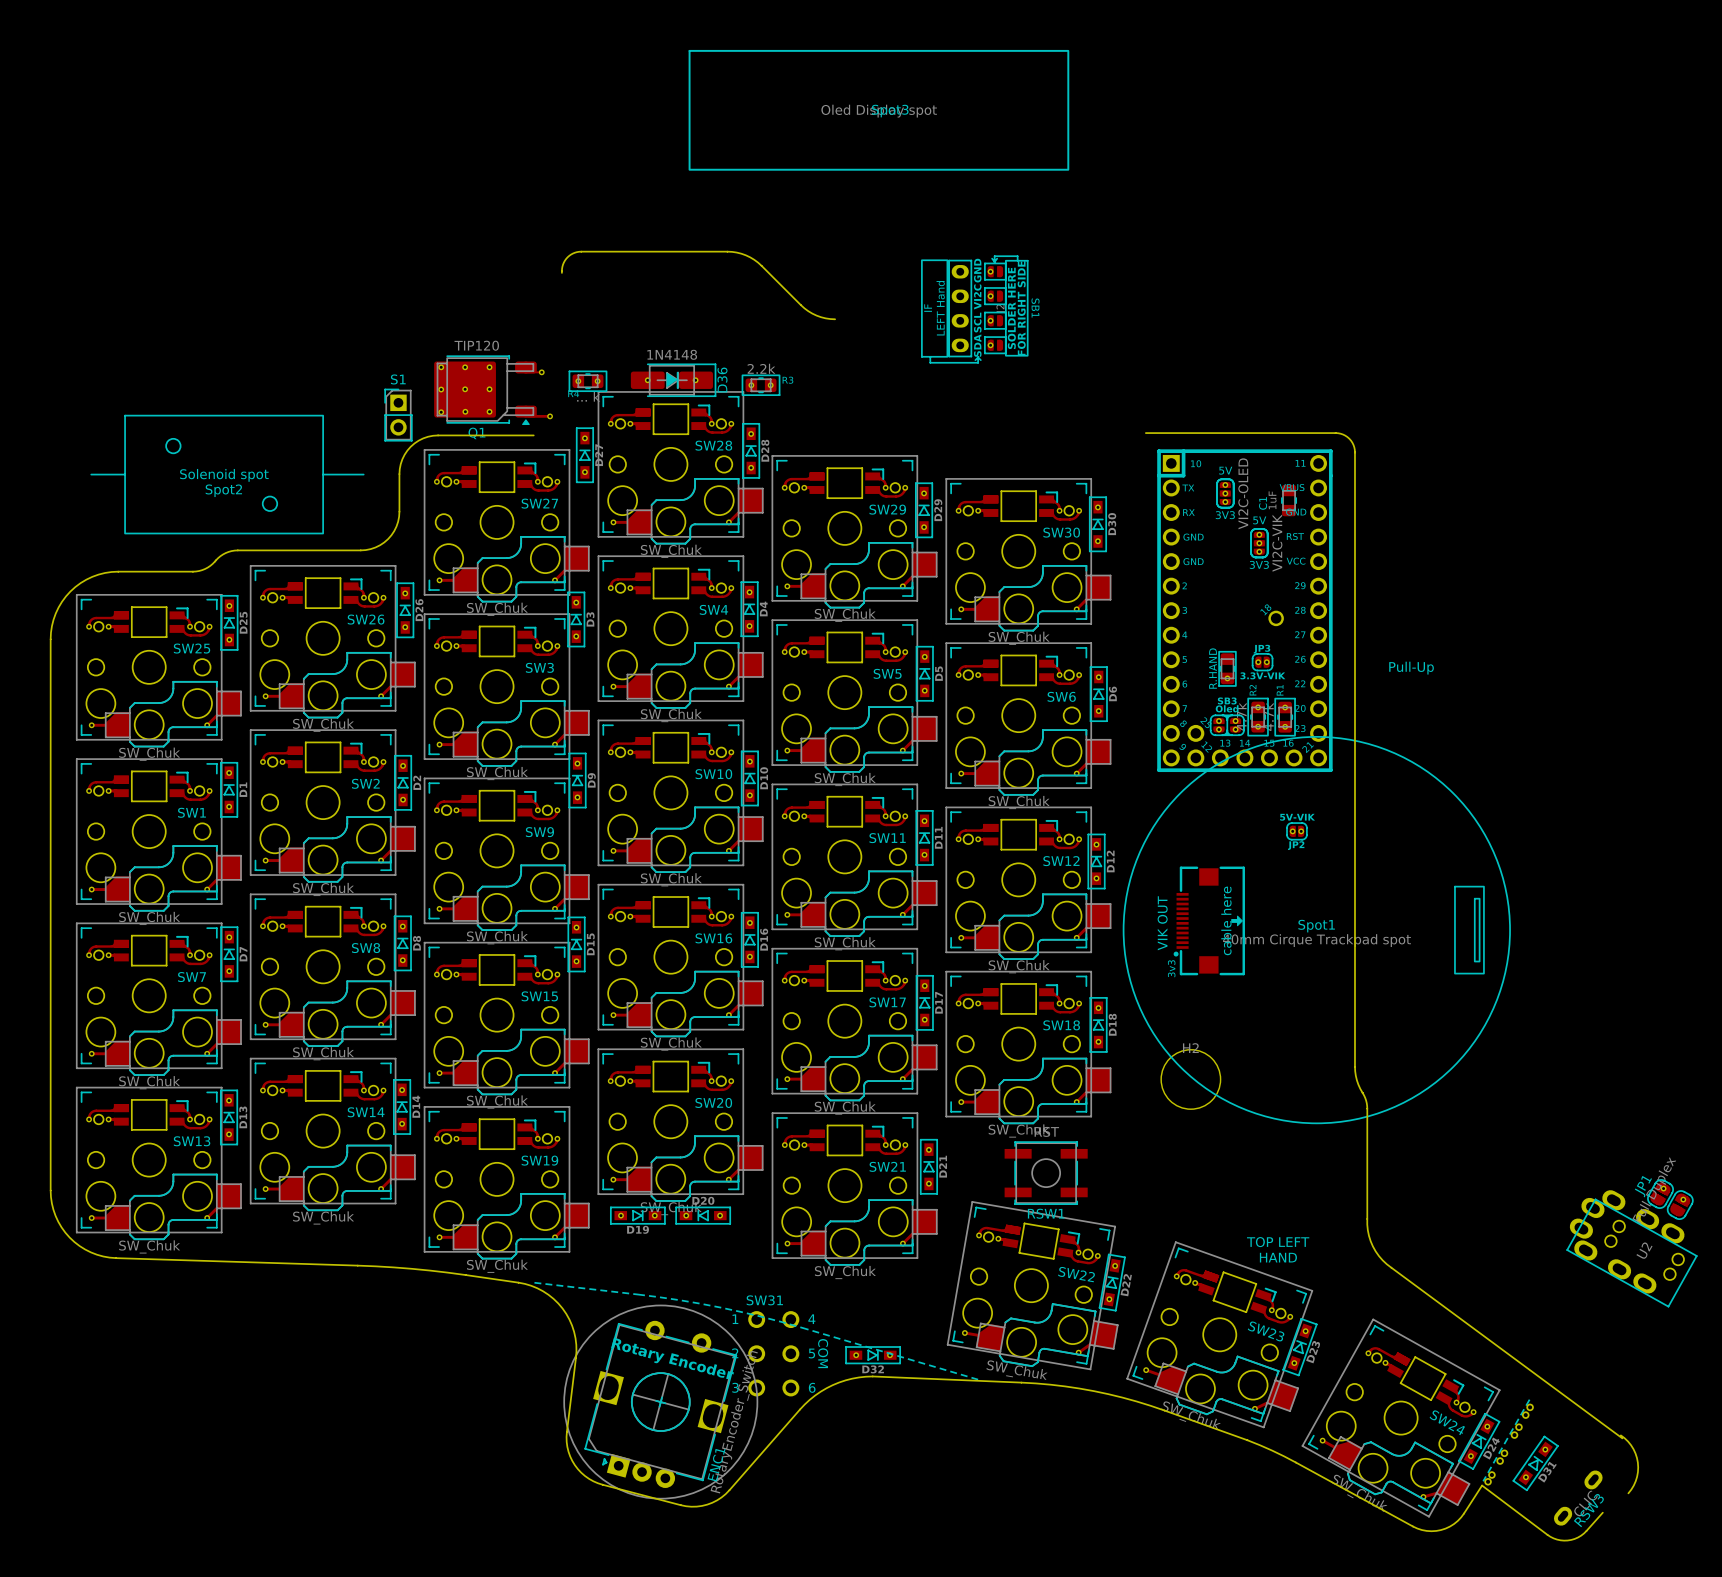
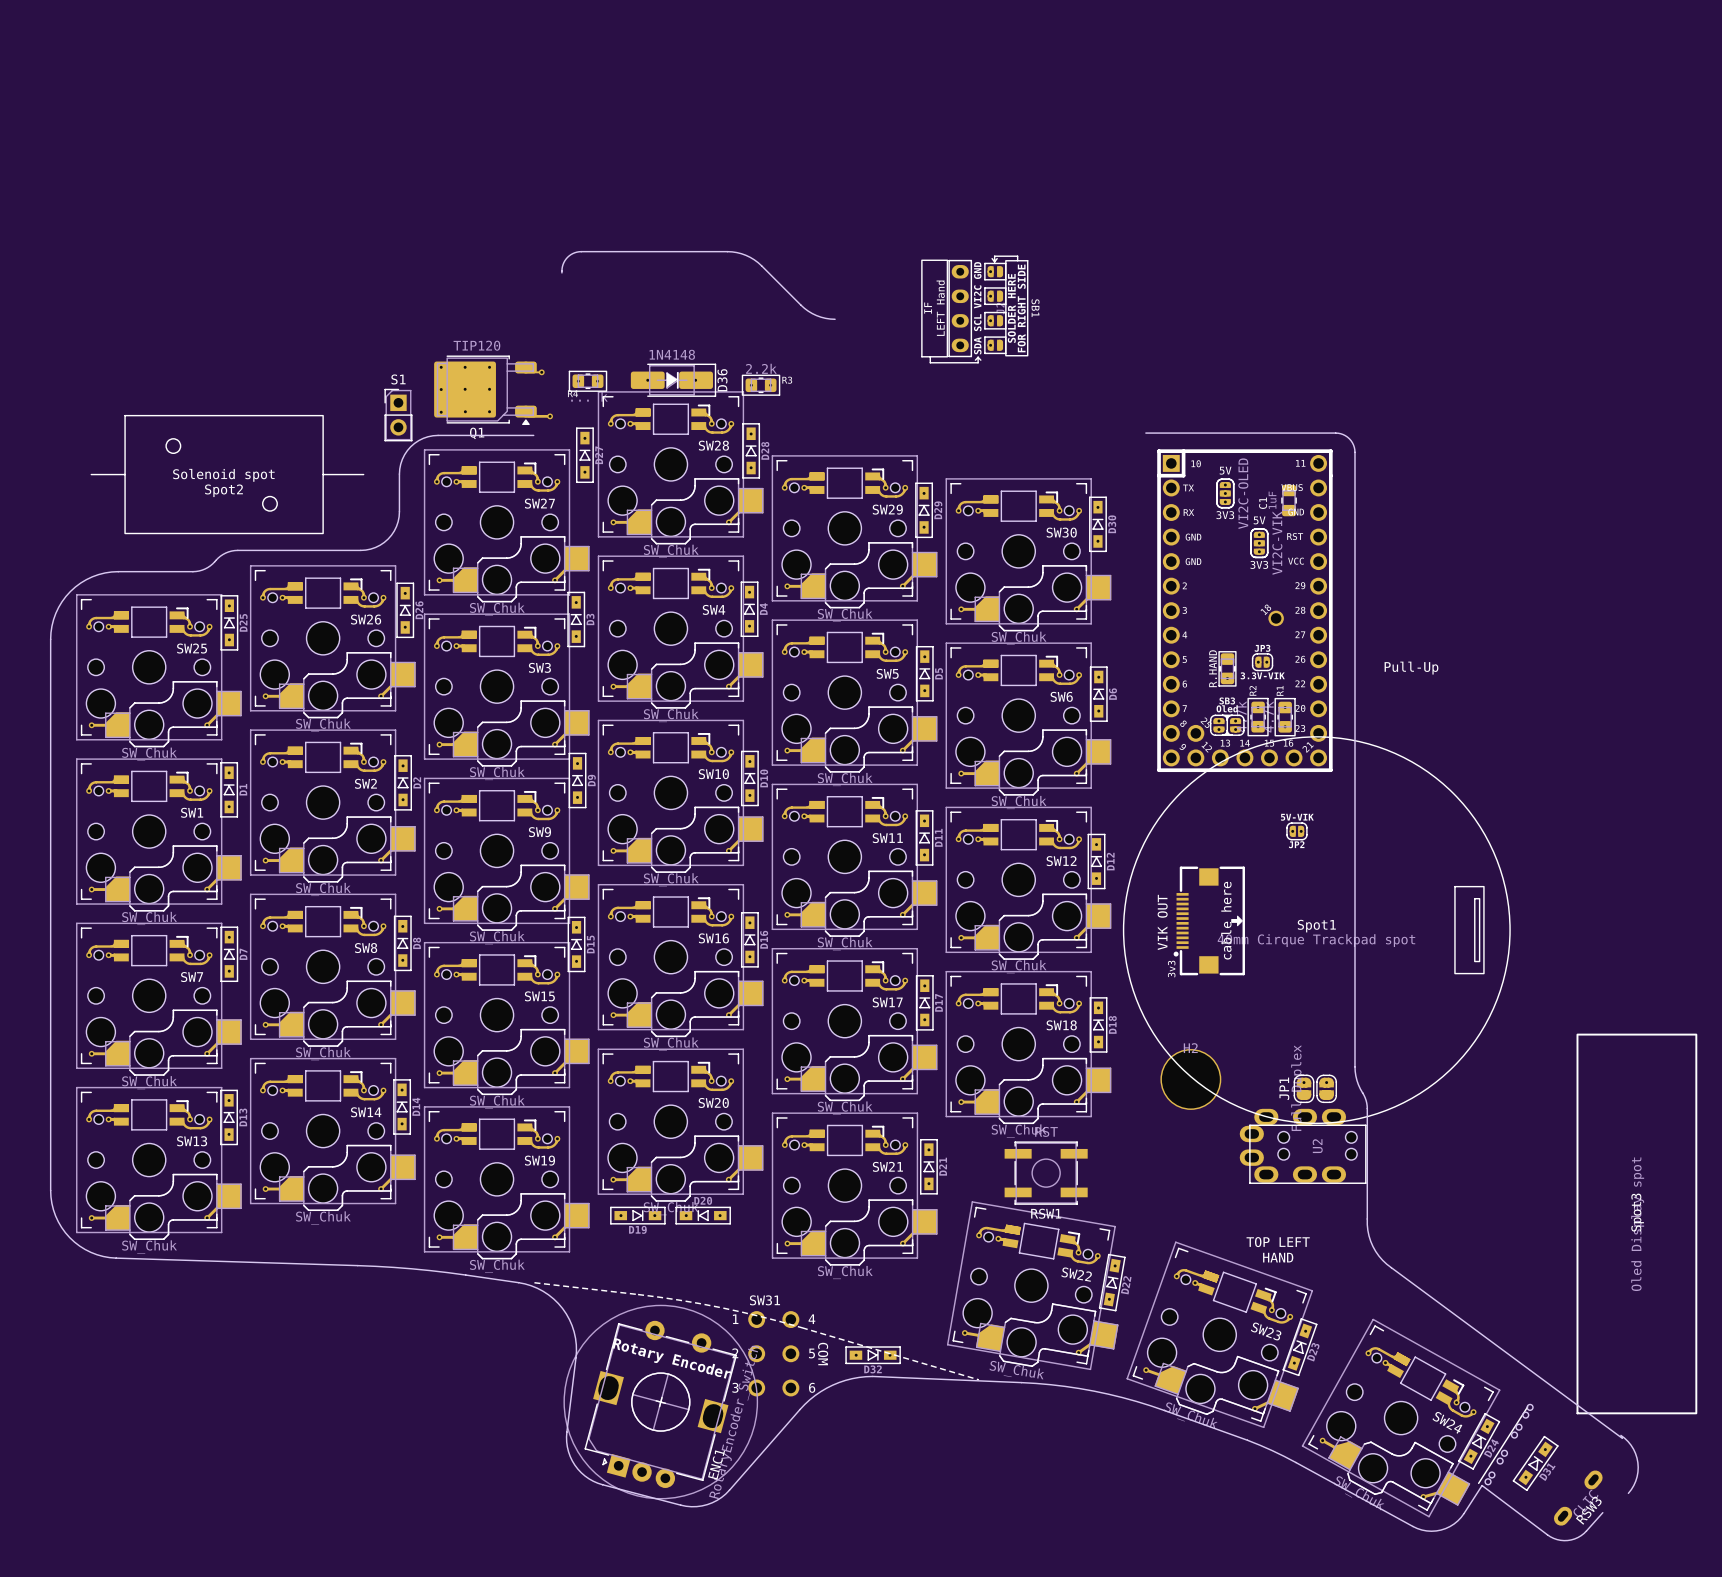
Spot3 rotation: 0° (878, 110) -> 90° clockwise (1636, 1223)
Spot3 position: (878, 110) -> (1636, 1223)
JP1 footprint: [1647, 1179, 1694, 1220] -> [1293, 1074, 1337, 1103]
U2 rotation: 0° (1631, 1248) -> 29.2° counterclockwise (1303, 1146)
U2 position: (1631, 1248) -> (1303, 1146)
line: (1529, 1399) (1483, 1481) -> none
line: none -> (1527, 1406) (1478, 1483)

